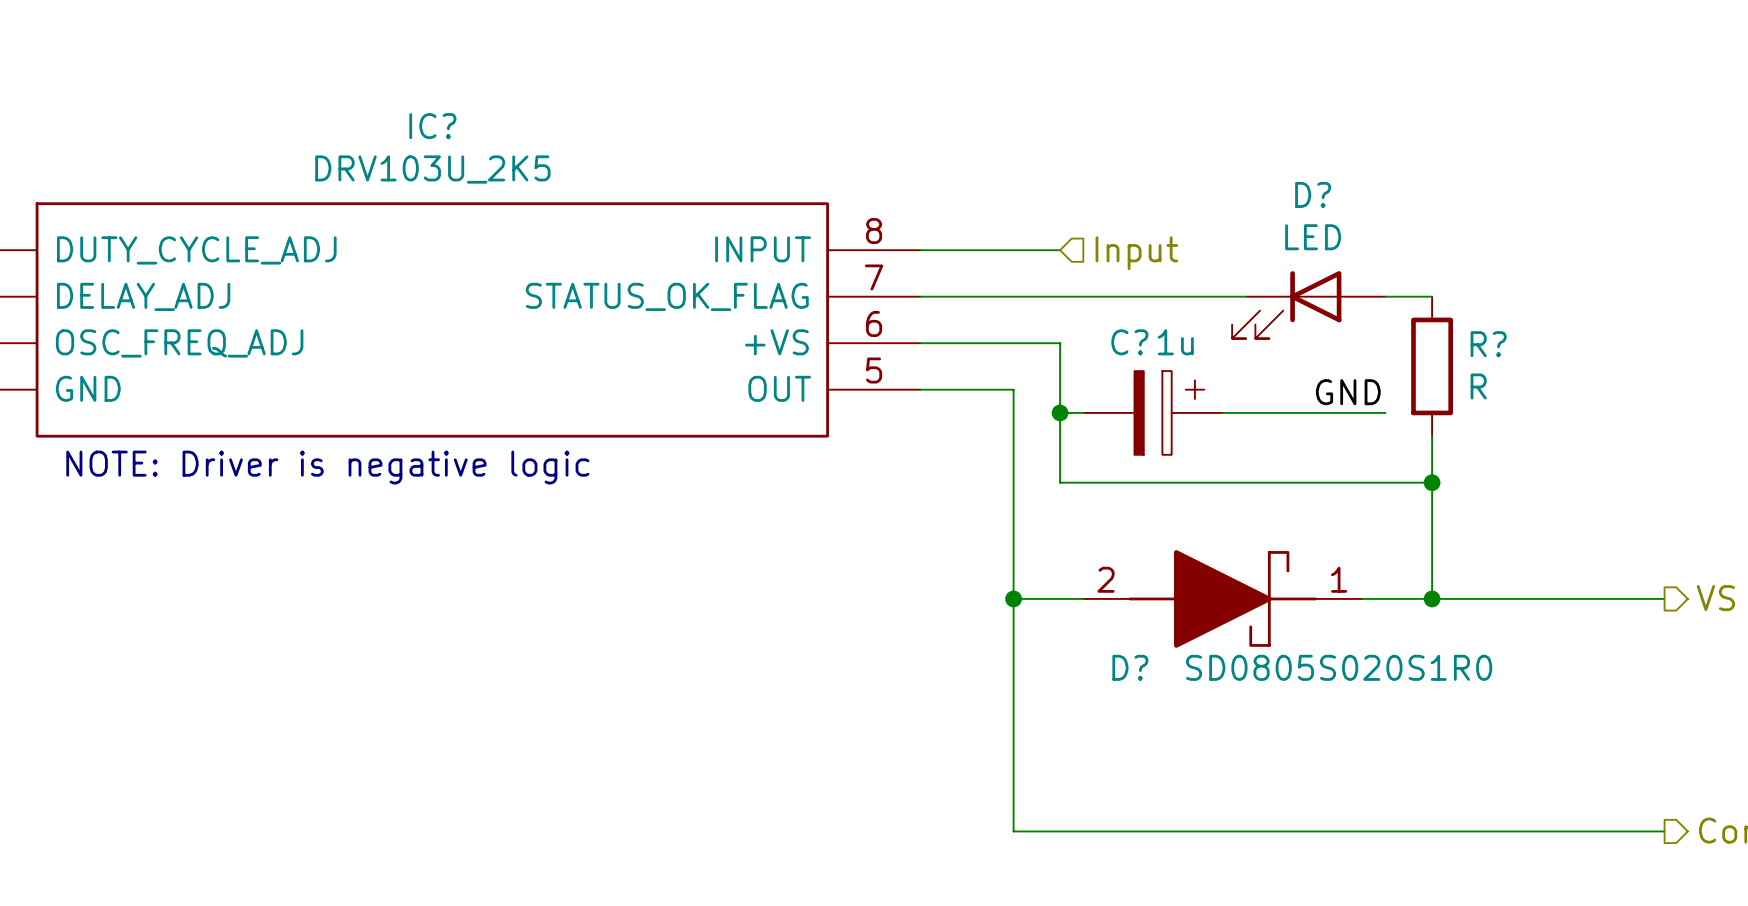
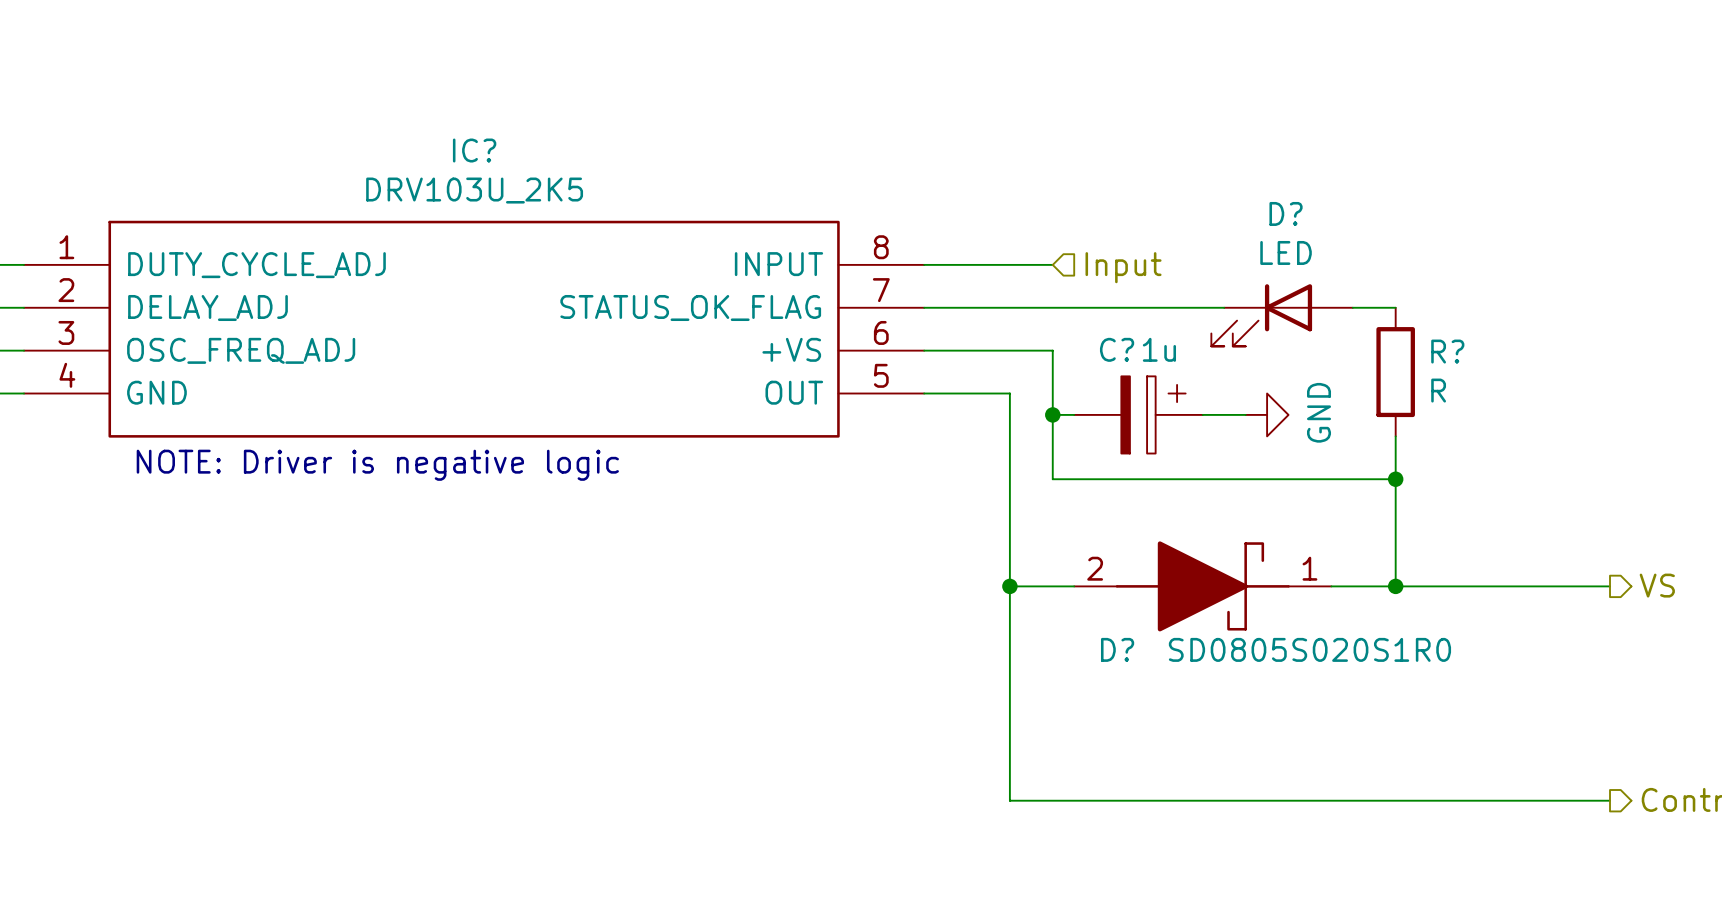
label: GND (1348, 392) -> none
wire: (1269, 412) (1385, 412) -> none
power symbol: none -> GND (1267, 414)

